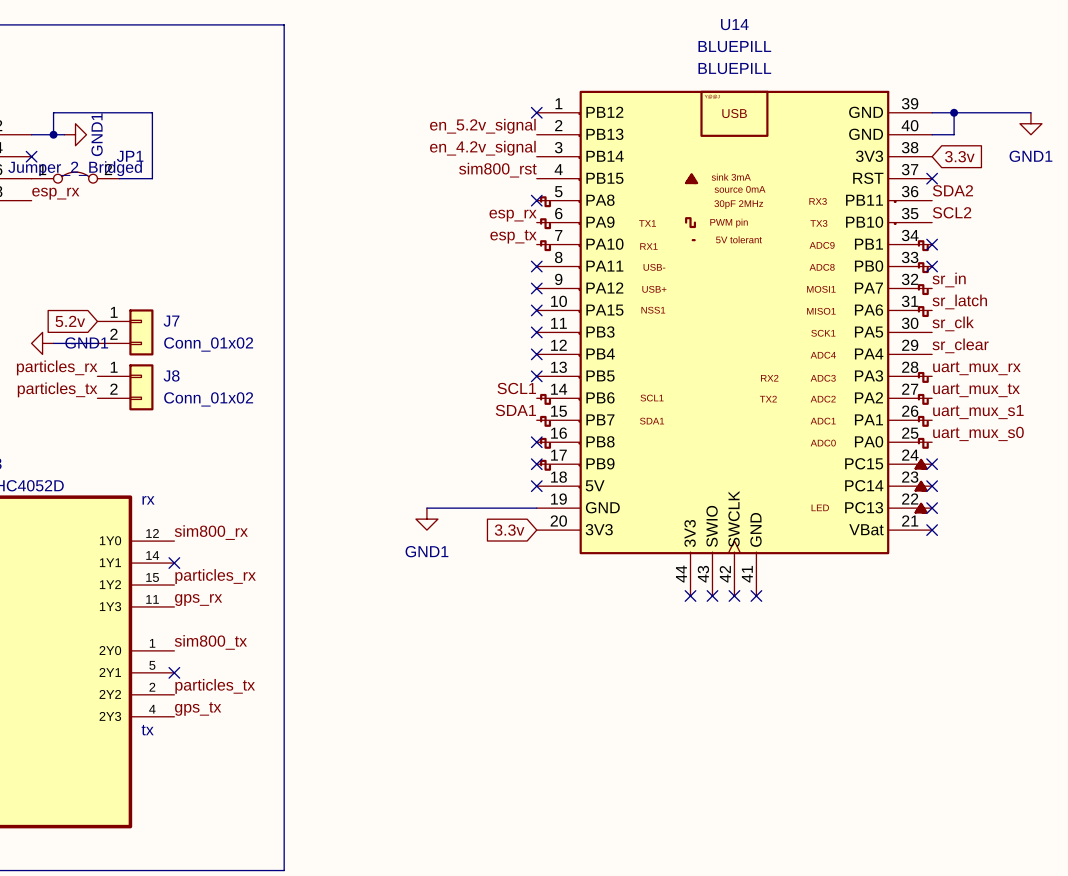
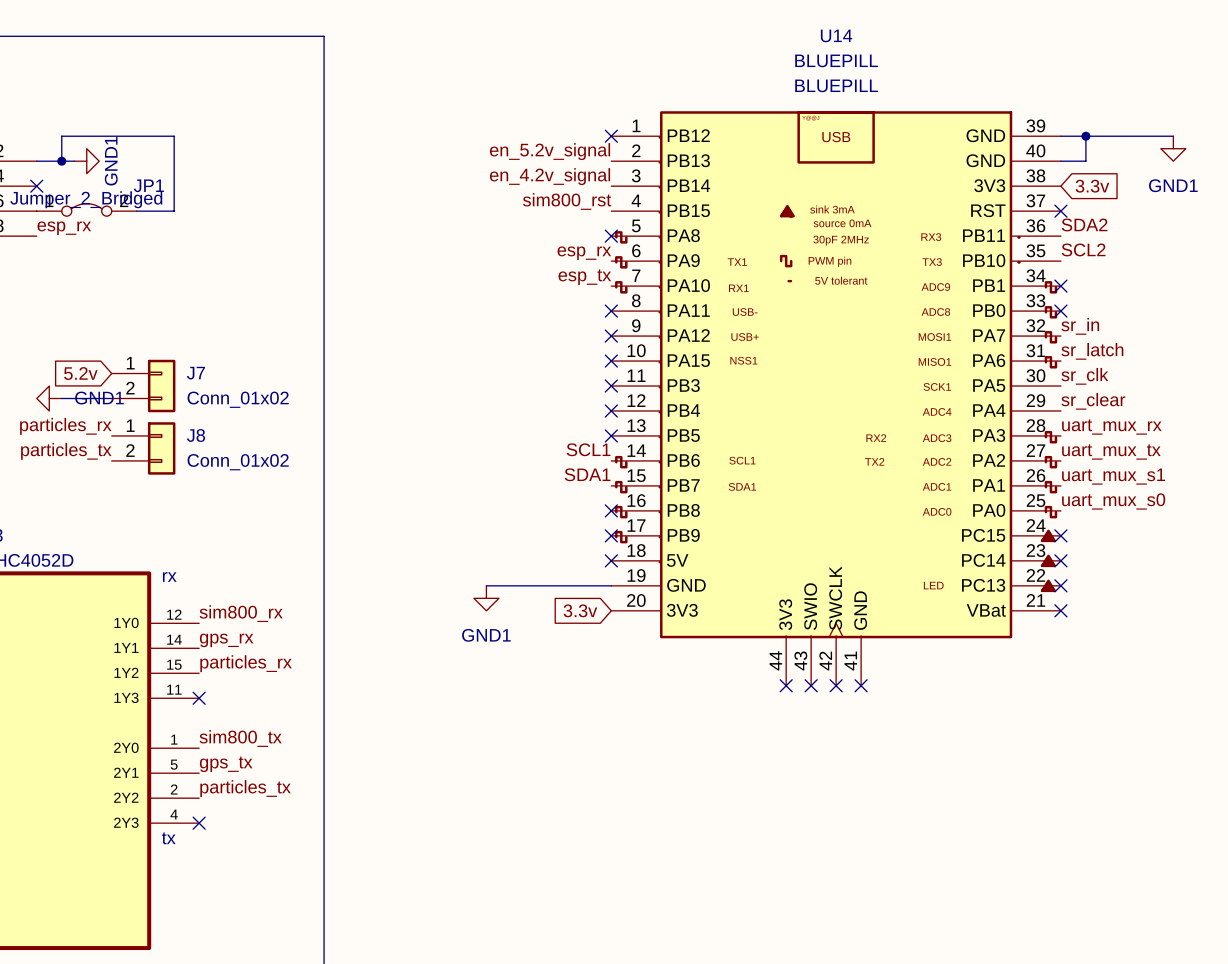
no-connect mark: (174, 563) -> none
label position: gps_rx (198, 600) -> gps_rx (226, 640)
no-connect mark: none -> (199, 698)
no-connect mark: (174, 672) -> none
label position: gps_tx (198, 708) -> gps_tx (226, 764)
no-connect mark: none -> (199, 823)

